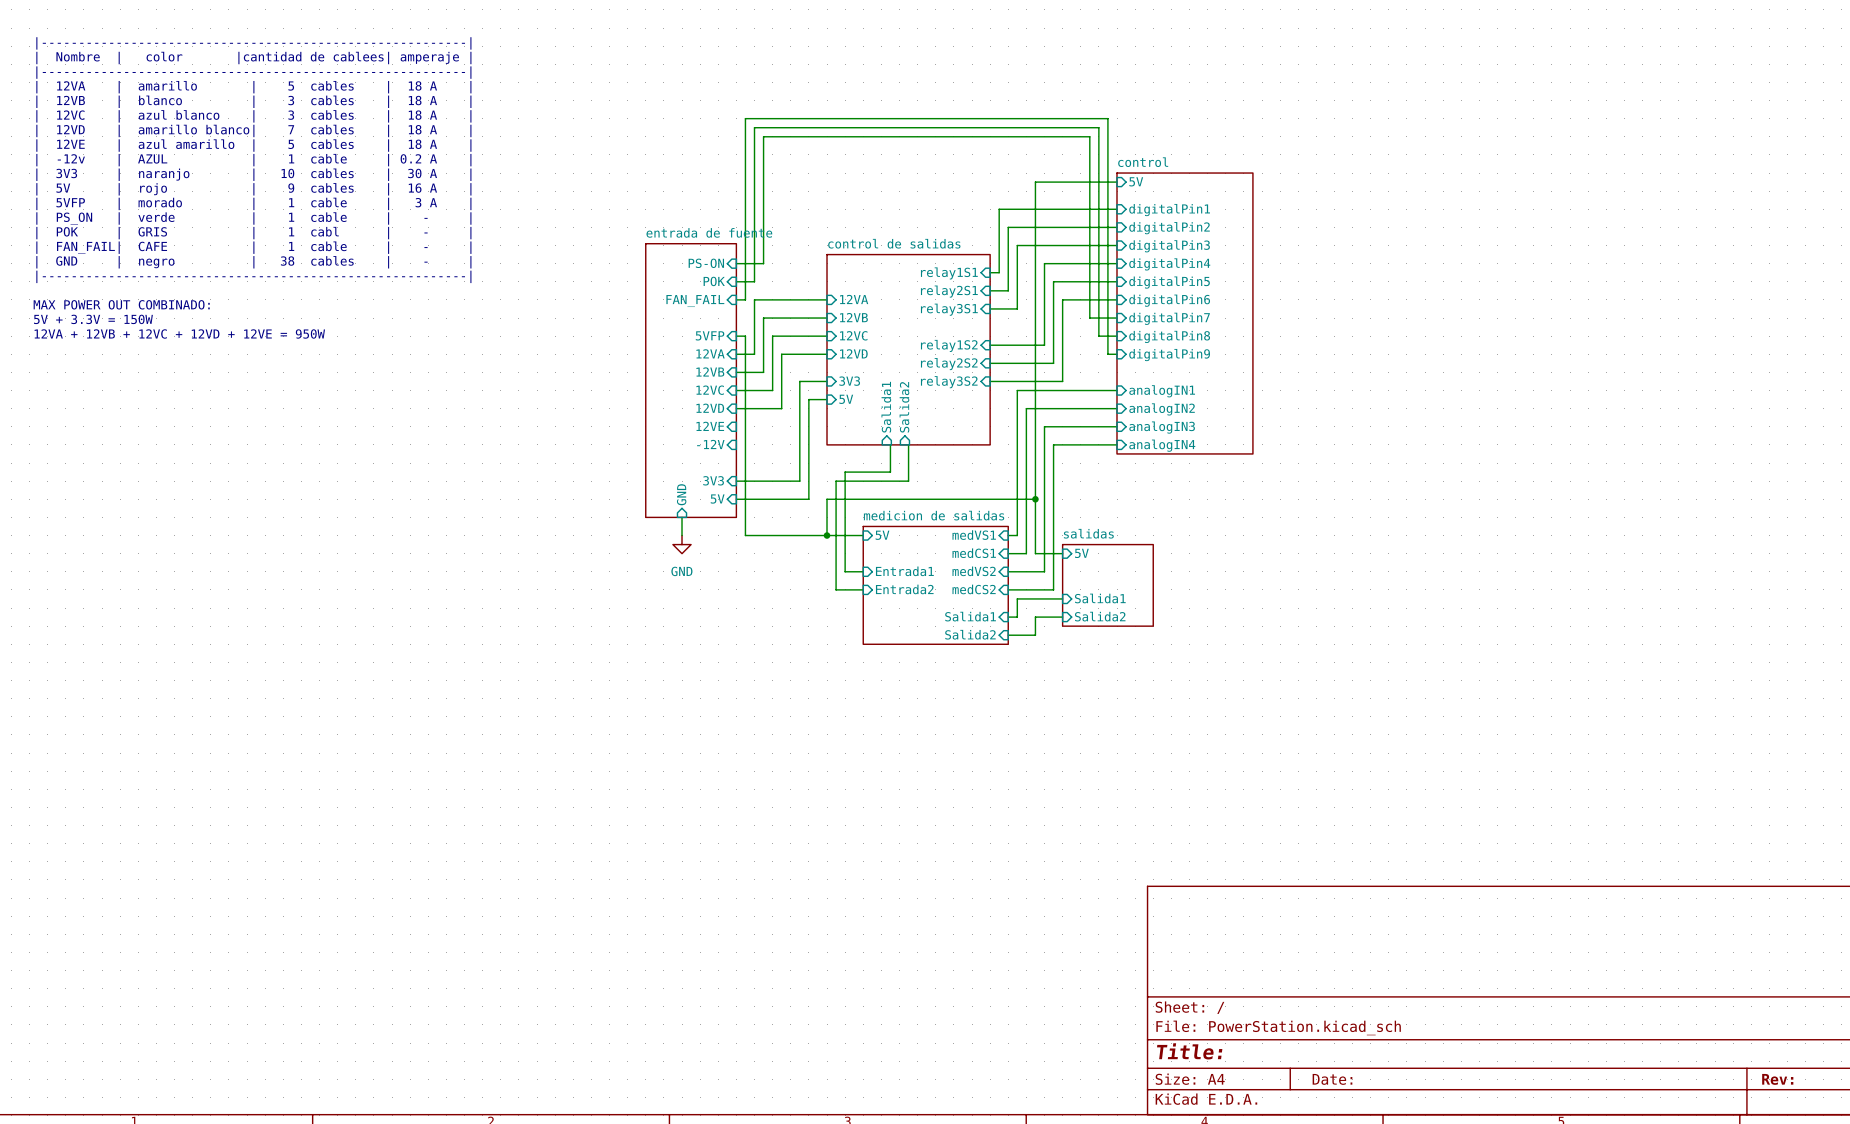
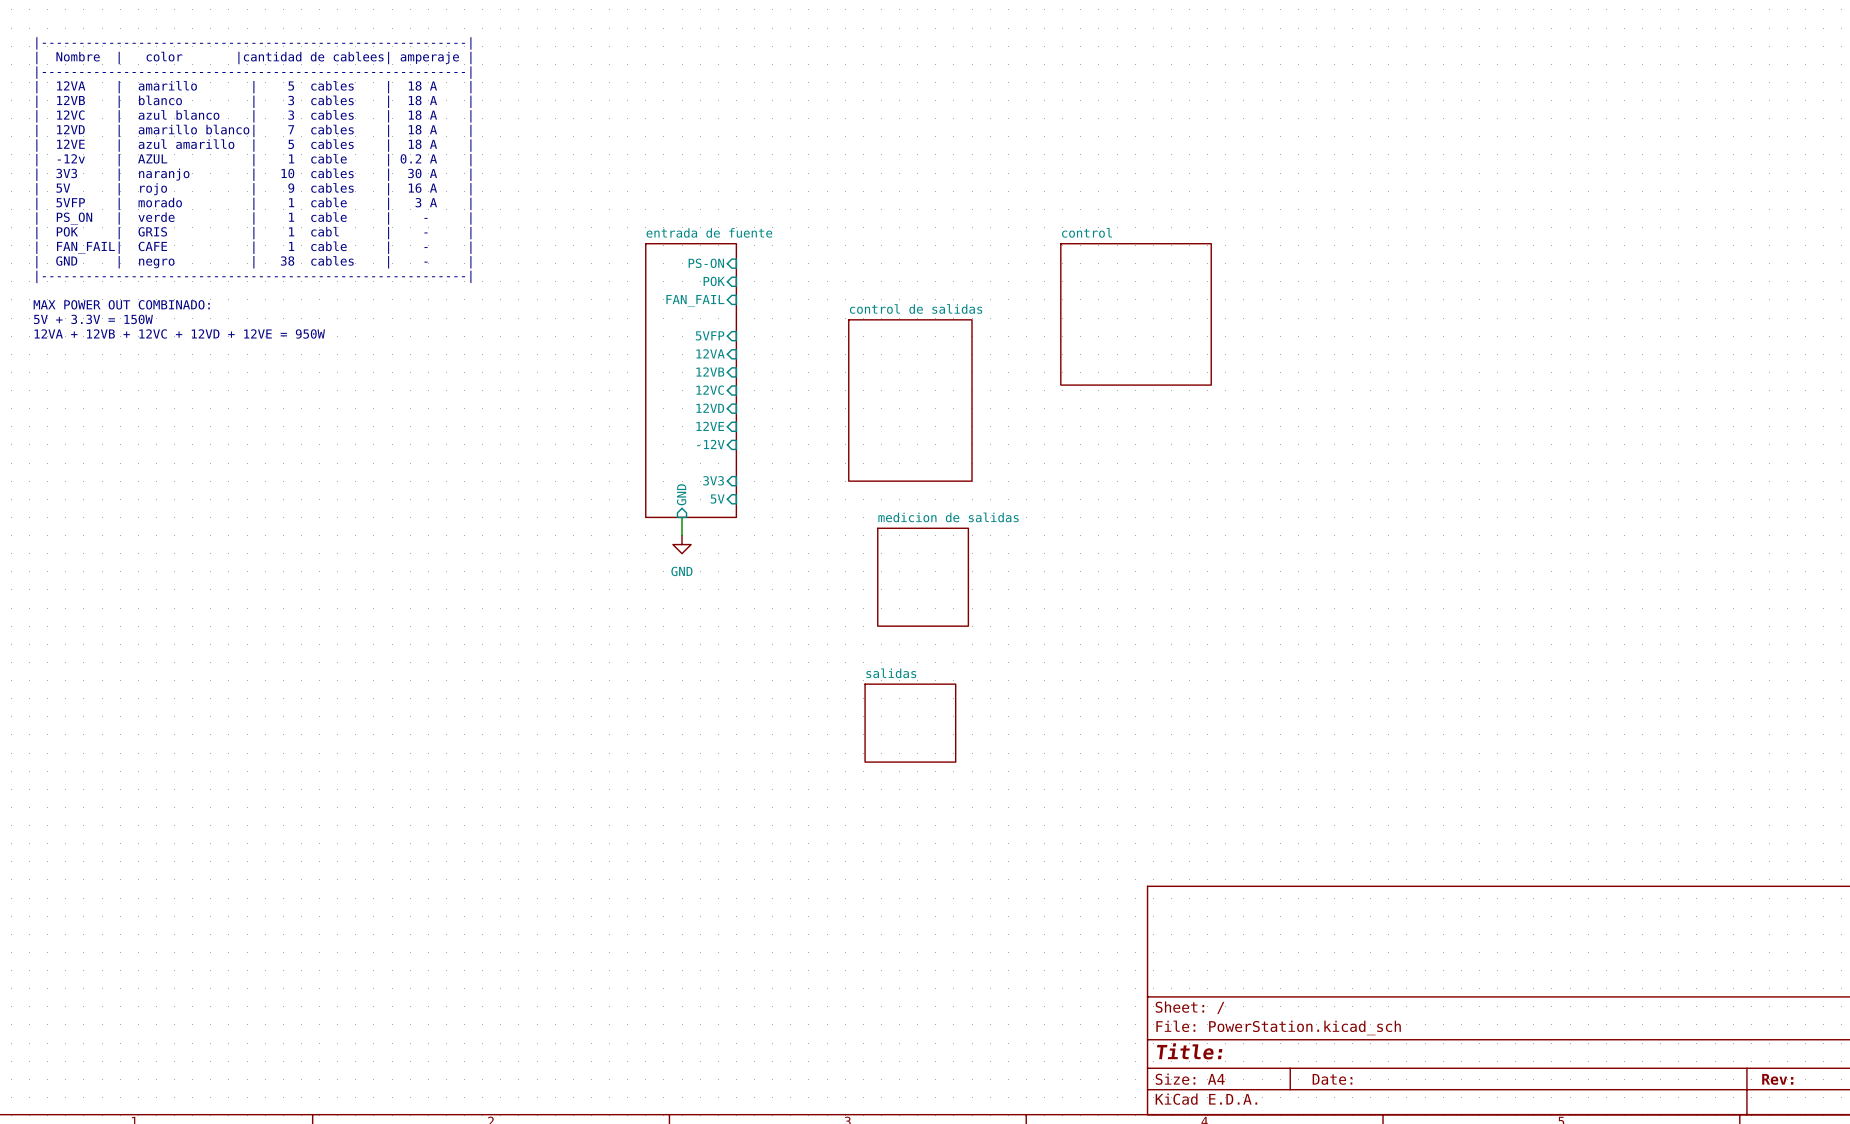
sheet pin: 5V (1136, 181) -> none
wire: (1117, 182) (1035, 182) (1035, 553) (1062, 553) -> none
wire: (1117, 209) (999, 209) (999, 272) (990, 272) -> none
sheet pin: digitalPin1 (1169, 210) -> none
wire: (1117, 227) (1008, 227) (1008, 290) (990, 290) -> none
sheet pin: digitalPin2 (1169, 228) -> none
wire: (1117, 245) (1017, 245) (1017, 308) (990, 308) -> none
sheet pin: digitalPin3 (1169, 246) -> none
wire: (736, 263) (763, 263) (763, 136) (1089, 136) (1089, 318) (1117, 318) -> none
wire: (1117, 263) (1044, 263) (1044, 345) (990, 345) -> none
sheet pin: digitalPin4 (1169, 264) -> none
sheet pin: relay1S1 (949, 273) -> none
wire: (736, 281) (754, 281) (754, 127) (1098, 127) (1098, 336) (1117, 336) -> none
wire: (1117, 281) (1053, 281) (1053, 363) (990, 363) -> none
sheet pin: digitalPin5 (1169, 282) -> none
sheet pin: relay2S1 (949, 291) -> none
wire: (736, 299) (745, 299) (745, 118) (1107, 118) (1107, 354) (1117, 354) -> none
wire: (827, 299) (754, 299) (754, 354) (736, 354) -> none
sheet pin: 12VA (854, 299) -> none
wire: (1117, 299) (1062, 299) (1062, 381) (990, 381) -> none
sheet pin: digitalPin6 (1169, 300) -> none
sheet pin: relay3S1 (949, 309) -> none
sheet control: (1184, 313) -> none
sheet control: none -> (1136, 314)
sheet pin: 12VB (853, 317) -> none
wire: (827, 318) (763, 318) (763, 372) (736, 372) -> none
sheet pin: digitalPin7 (1169, 318) -> none
sheet pin: 12VC (853, 335) -> none
wire: (736, 336) (745, 336) (745, 535) (863, 535) -> none
wire: (827, 336) (772, 336) (772, 390) (736, 390) -> none
sheet pin: digitalPin8 (1169, 336) -> none
sheet pin: relay1S2 (949, 345) -> none
sheet control de salidas: (908, 349) -> none
sheet pin: 12VD (853, 353) -> none
wire: (827, 354) (781, 354) (781, 408) (736, 408) -> none
sheet pin: digitalPin9 (1169, 355) -> none
sheet pin: relay2S2 (949, 364) -> none
wire: (827, 381) (799, 381) (799, 481) (736, 481) -> none
sheet pin: 3V3 (849, 381) -> none
sheet pin: relay3S2 (949, 382) -> none
wire: (1117, 390) (1017, 390) (1017, 535) (1008, 535) -> none
sheet pin: analogIN1 (1162, 391) -> none
wire: (827, 399) (808, 399) (808, 499) (736, 499) -> none
sheet pin: 5V (846, 399) -> none
sheet control de salidas: none -> (910, 400)
sheet pin: Salida1 (886, 407) -> none
sheet pin: Salida2 (904, 407) -> none
wire: (1117, 408) (1026, 408) (1026, 553) (1008, 553) -> none
sheet pin: analogIN2 (1162, 409) -> none
wire: (1117, 426) (1044, 426) (1044, 571) (1008, 571) -> none
sheet pin: analogIN3 (1162, 427) -> none
wire: (890, 444) (890, 472) (845, 472) (845, 571) (863, 571) -> none
wire: (908, 444) (908, 481) (836, 481) (836, 589) (863, 589) -> none
wire: (1117, 444) (1053, 444) (1053, 589) (1008, 589) -> none
sheet pin: analogIN4 (1162, 445) -> none
wire: (1035, 499) (827, 499) (827, 535) -> none
junction: (1035, 499) -> none
junction: (827, 535) -> none
sheet pin: 5V (882, 535) -> none
sheet pin: medVS1 (974, 535) -> none
sheet pin: medCS1 (974, 553) -> none
sheet pin: 5V (1081, 553) -> none
sheet pin: Entrada1 (904, 571) -> none
sheet pin: medVS2 (974, 571) -> none
sheet medicion de salidas: none -> (923, 577)
sheet medicion de salidas: (935, 585) -> none
sheet salidas: (1107, 585) -> none
sheet pin: Entrada2 (904, 589) -> none
sheet pin: medCS2 (974, 589) -> none
wire: (1062, 598) (1017, 598) (1017, 617) (1008, 617) -> none
sheet pin: Salida1 (1100, 598) -> none
sheet pin: Salida1 (970, 616) -> none
sheet pin: Salida2 (1100, 616) -> none
wire: (1062, 617) (1035, 617) (1035, 635) (1008, 635) -> none
sheet pin: Salida2 (970, 634) -> none
sheet salidas: none -> (910, 723)

